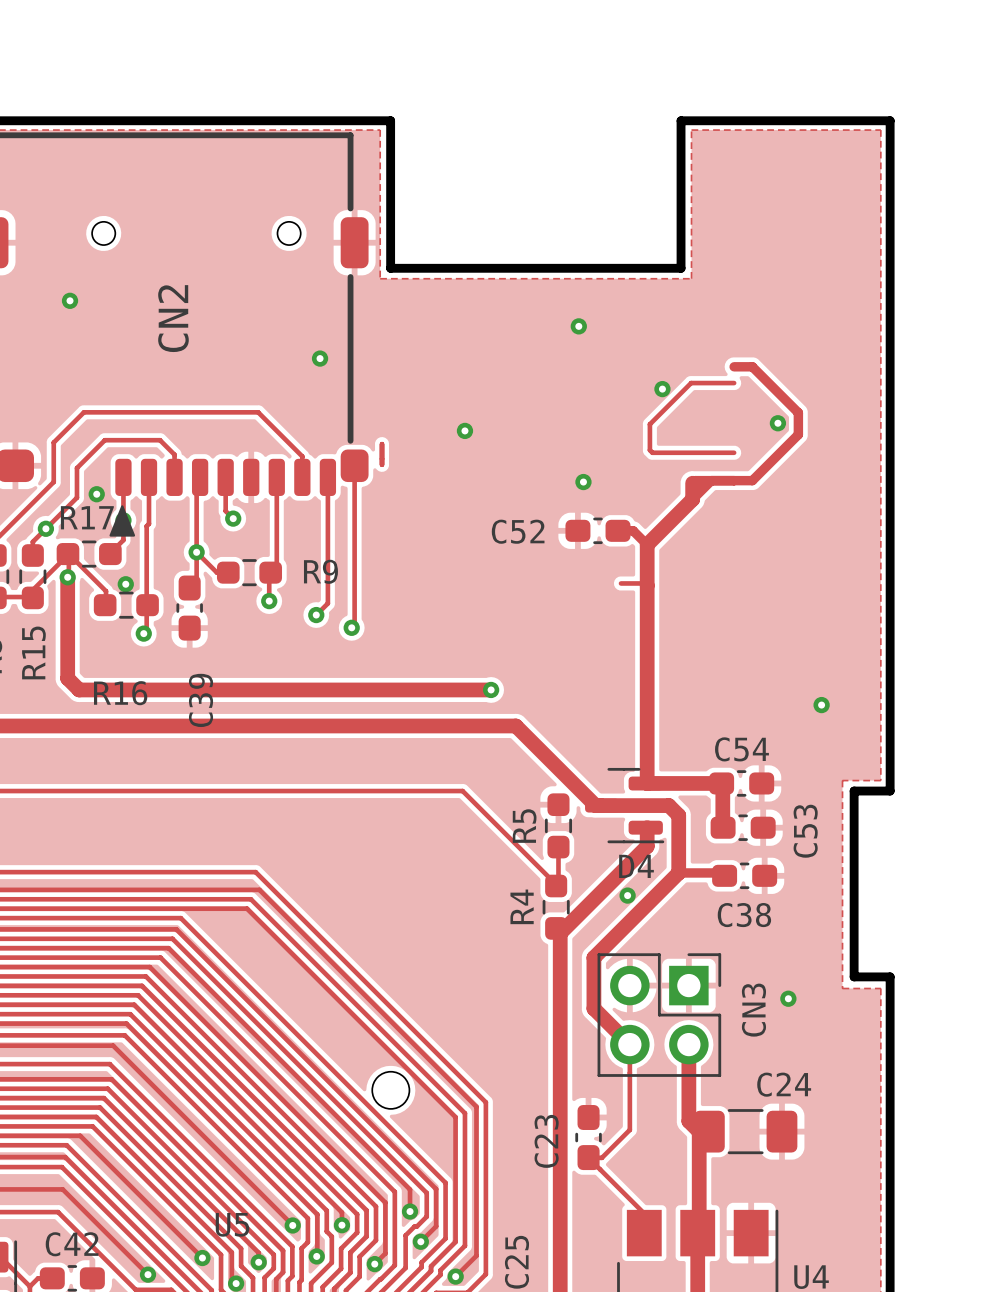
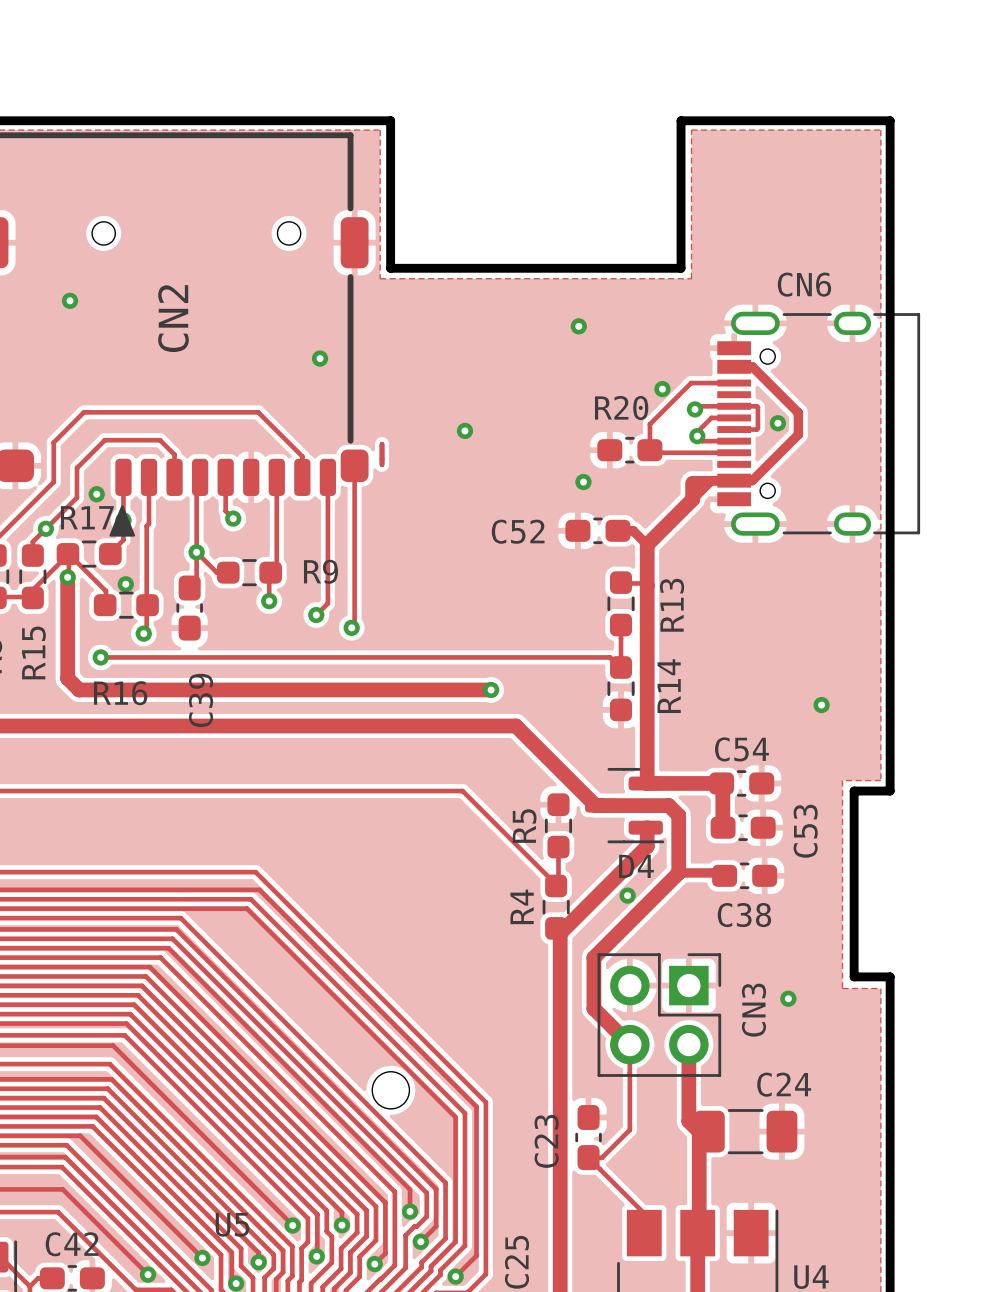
track: none -> (694, 409) (698, 406) (757, 407) (756, 429) (734, 429)
via: none -> (694, 409)
track: none -> (734, 417) (711, 417) (697, 432) (697, 436) (702, 441) (734, 441)
CN6: none -> (818, 423)
via: none -> (697, 436)
R20: none -> (629, 450)
R13: none -> (621, 603)
track: none -> (621, 624) (621, 668) (610, 657) (100, 657)
via: none -> (100, 657)
R14: none -> (621, 688)

